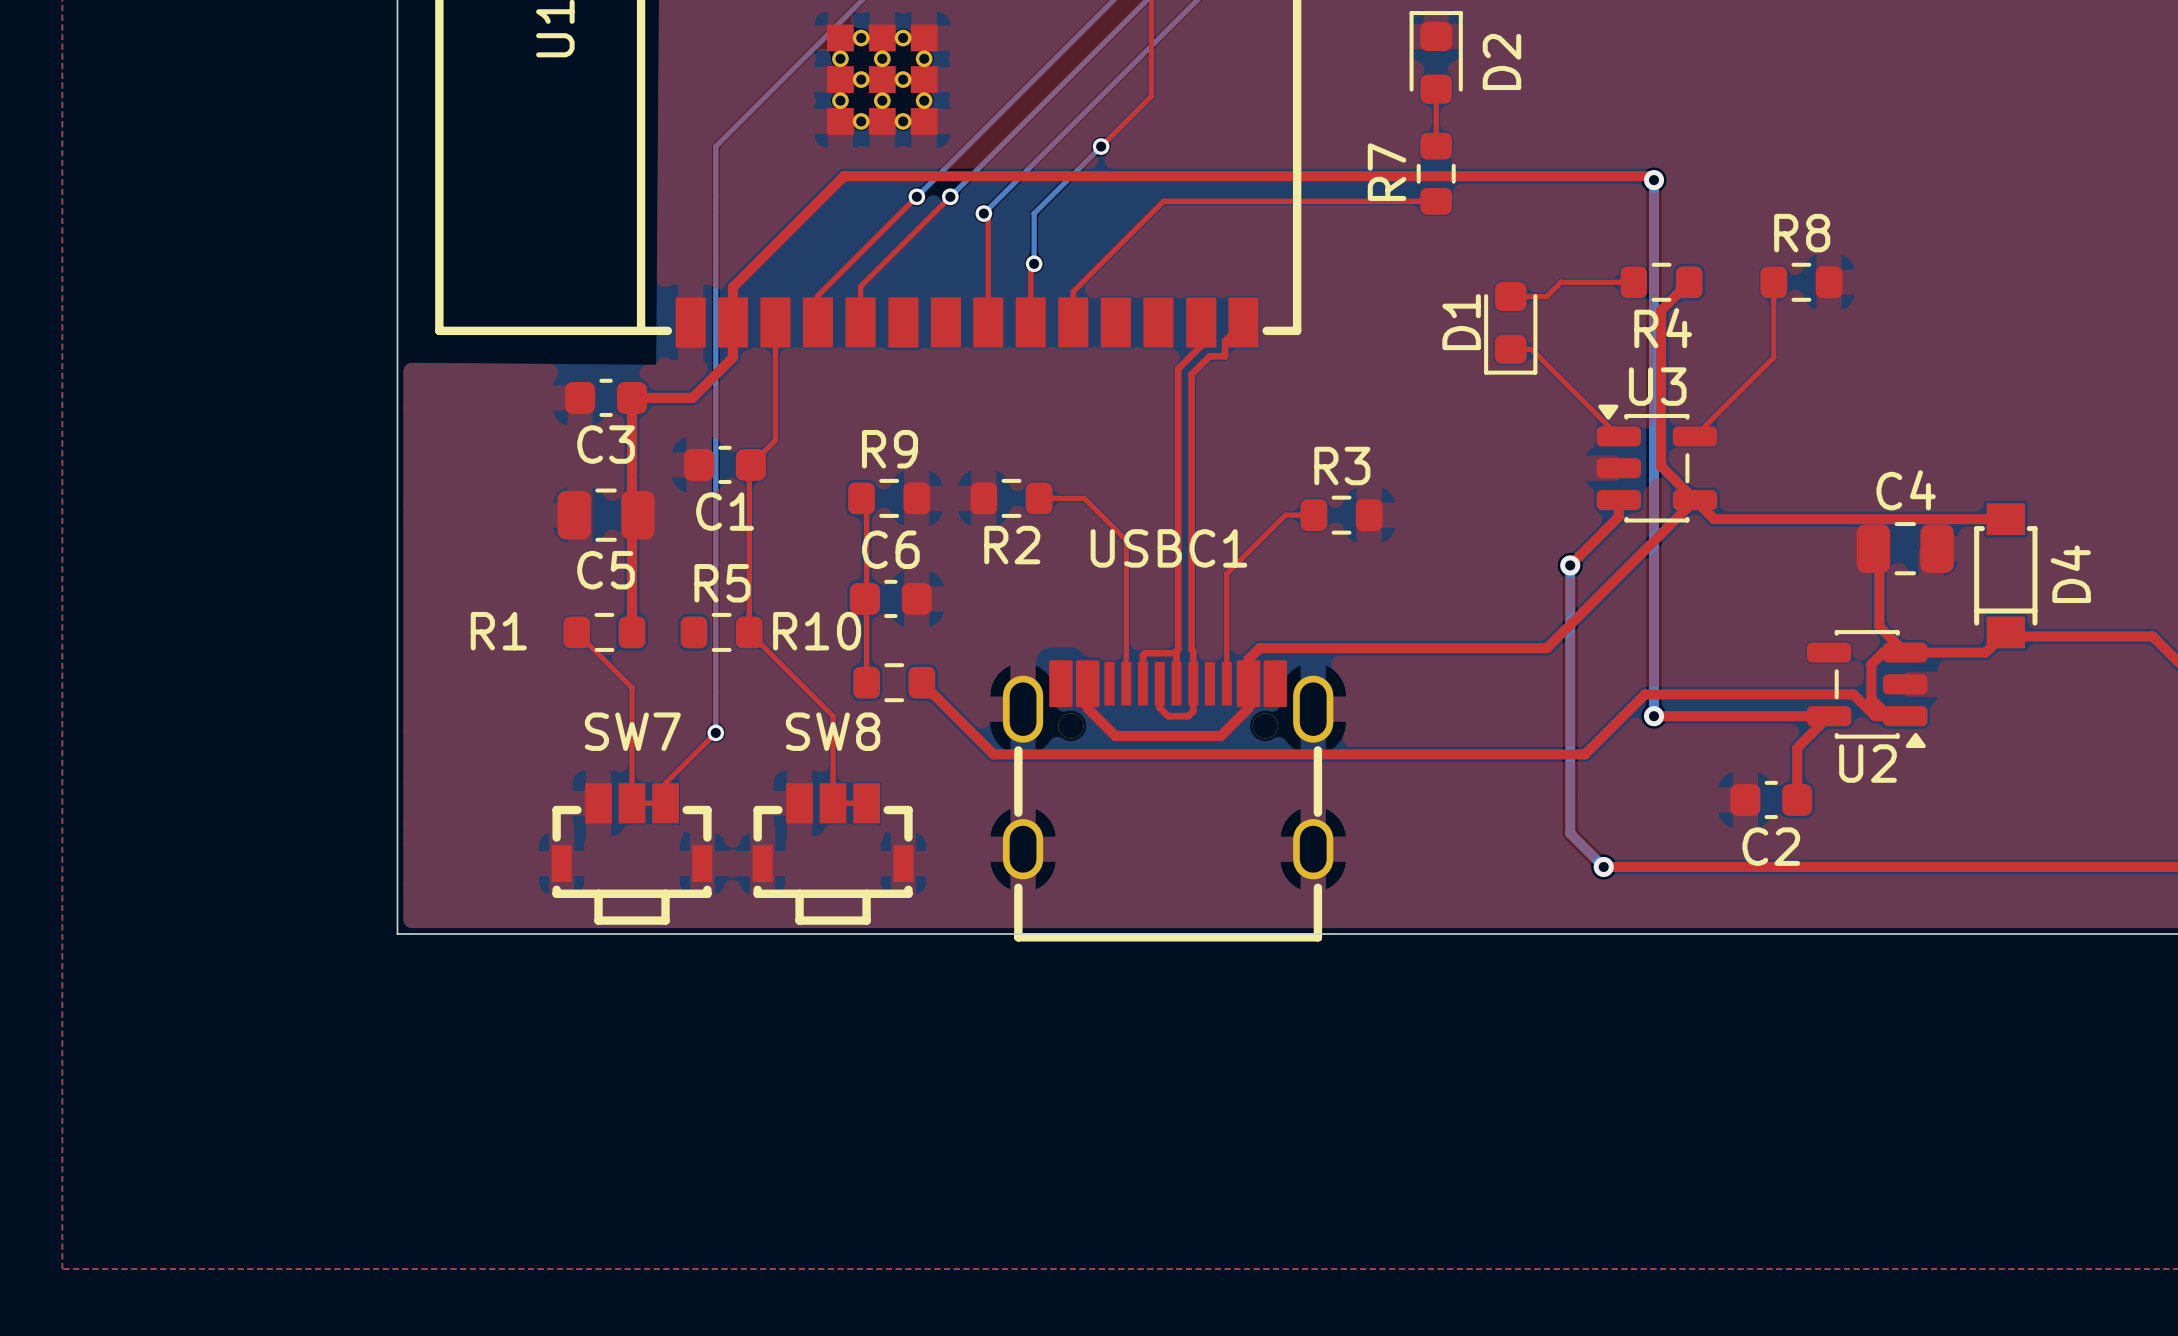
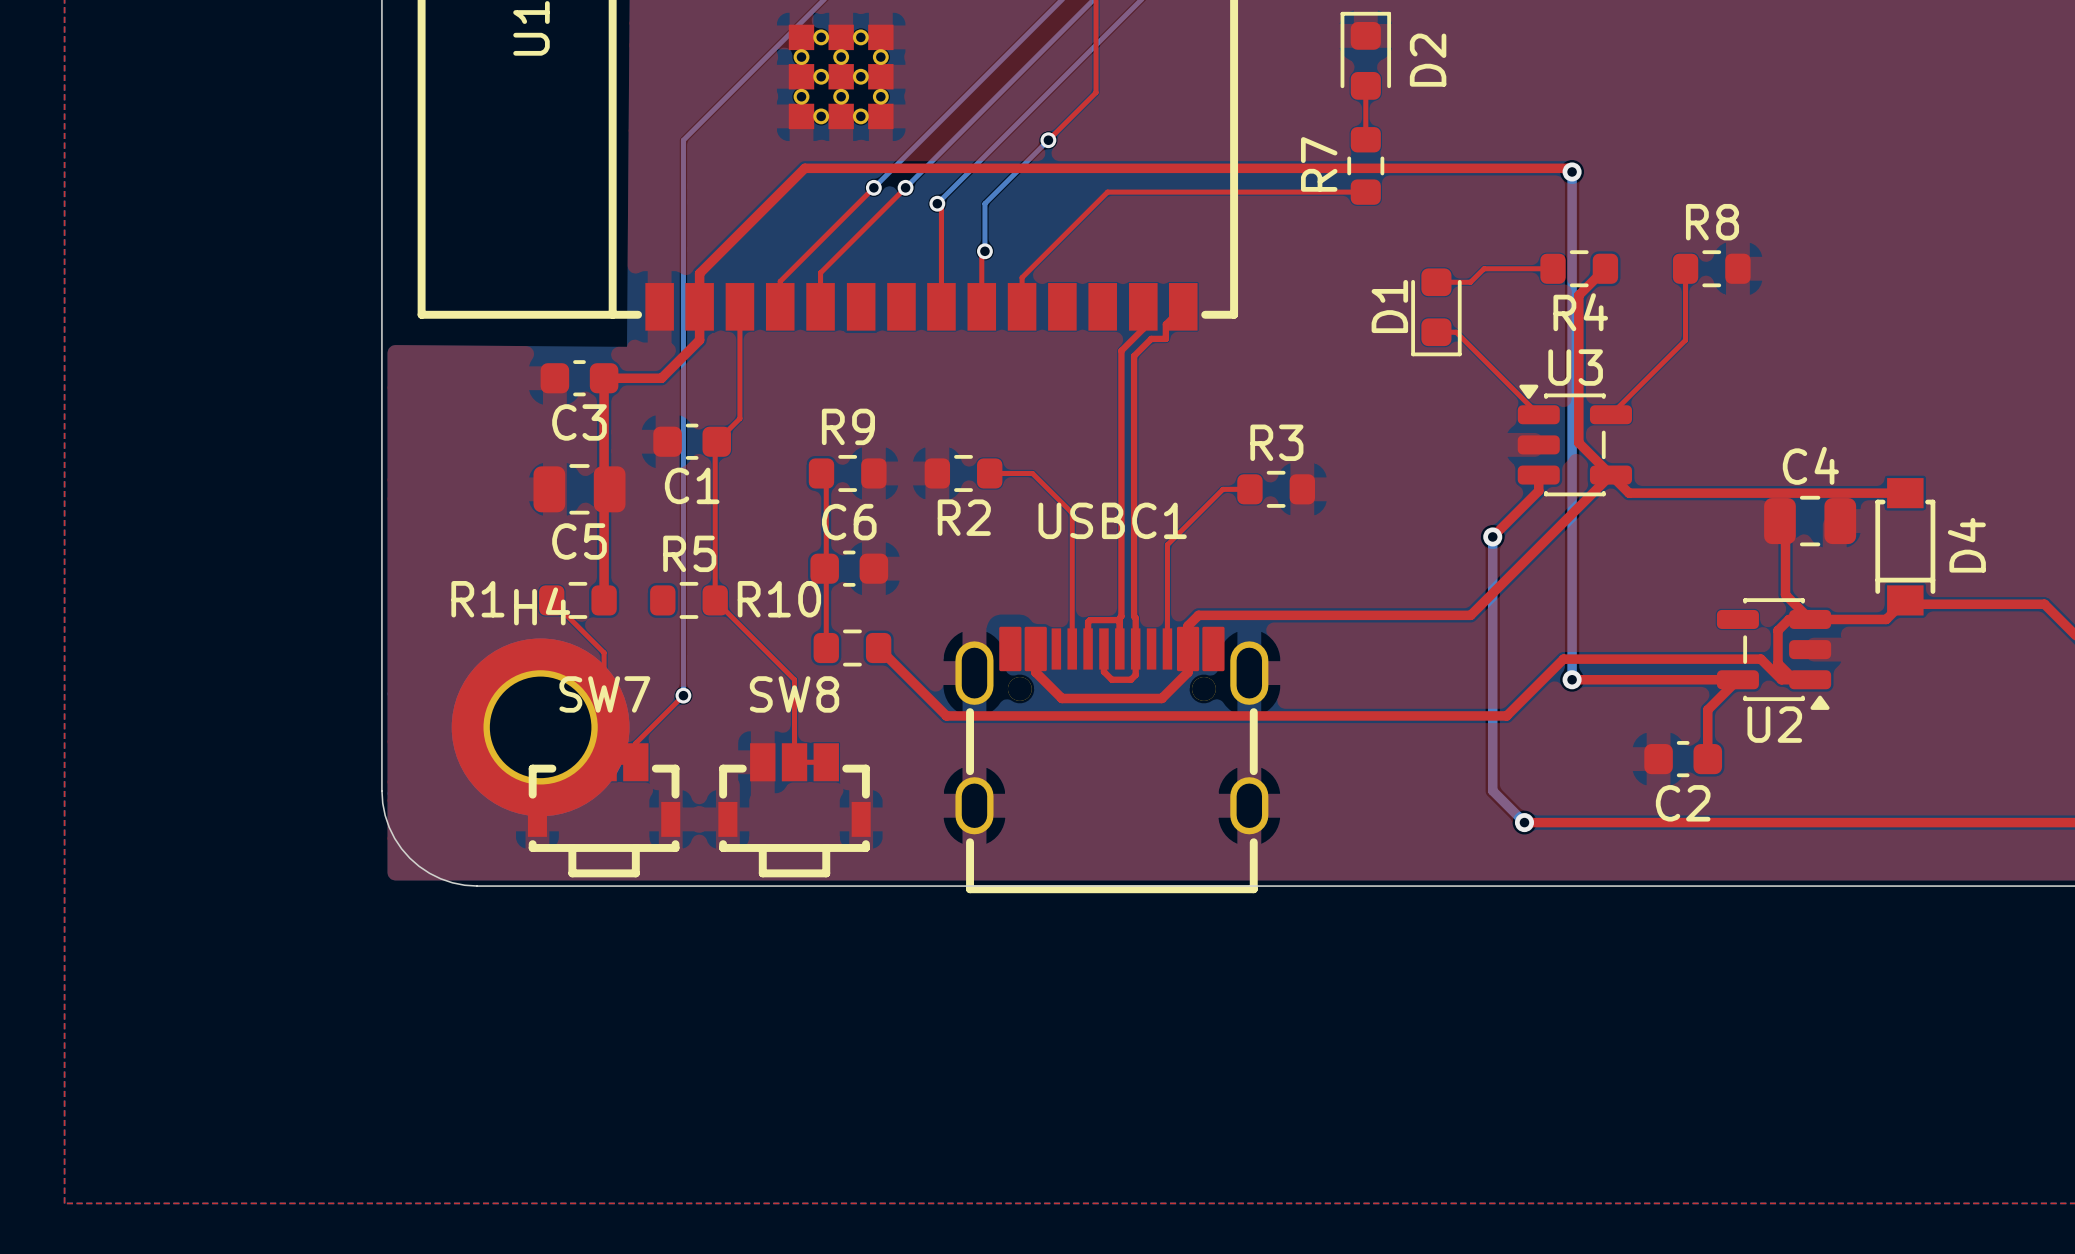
H4: none -> (540, 727)
board edge: (397, 833) (397, 933) (497, 933) -> (381, 790) (382, 803) (389, 827) (401, 848) (409, 858) (429, 873) (440, 878) (452, 882) (477, 886)

